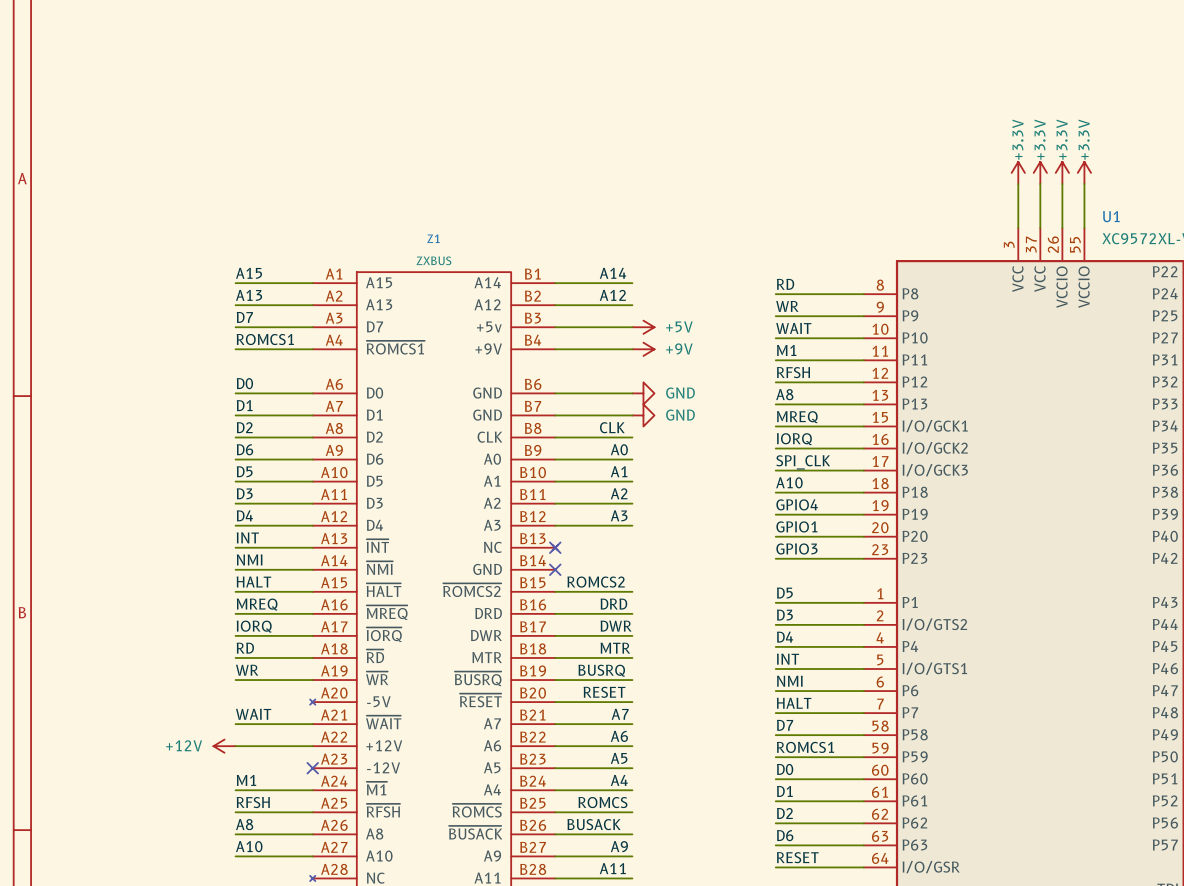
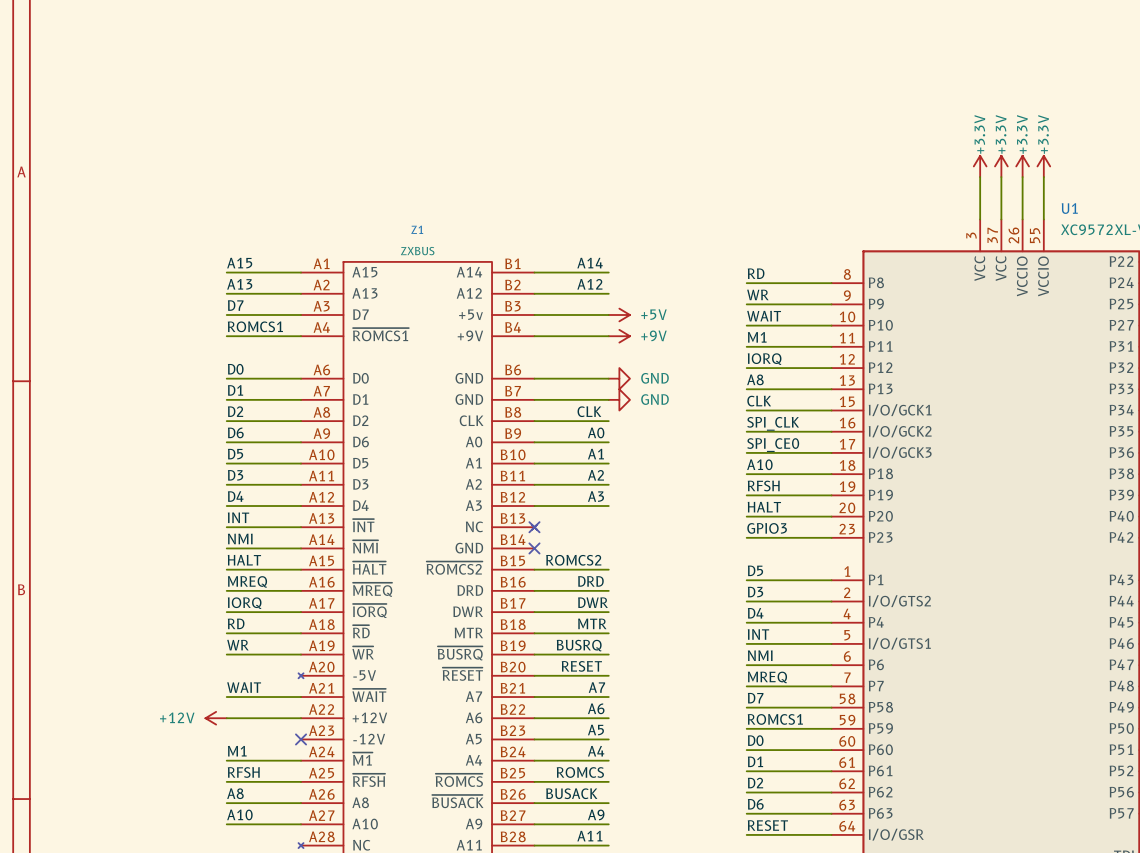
label: RFSH (793, 372) -> IORQ (764, 359)
label: MREQ (797, 417) -> CLK (759, 401)
label: IORQ (794, 439) -> SPI_CLK (773, 423)
label: SPI_CLK (803, 462) -> SPI_CE0 (773, 445)
label: GPIO4 (797, 504) -> RFSH (763, 485)
label: GPIO1 (796, 526) -> HALT (764, 507)
label: HALT (794, 703) -> MREQ (767, 677)

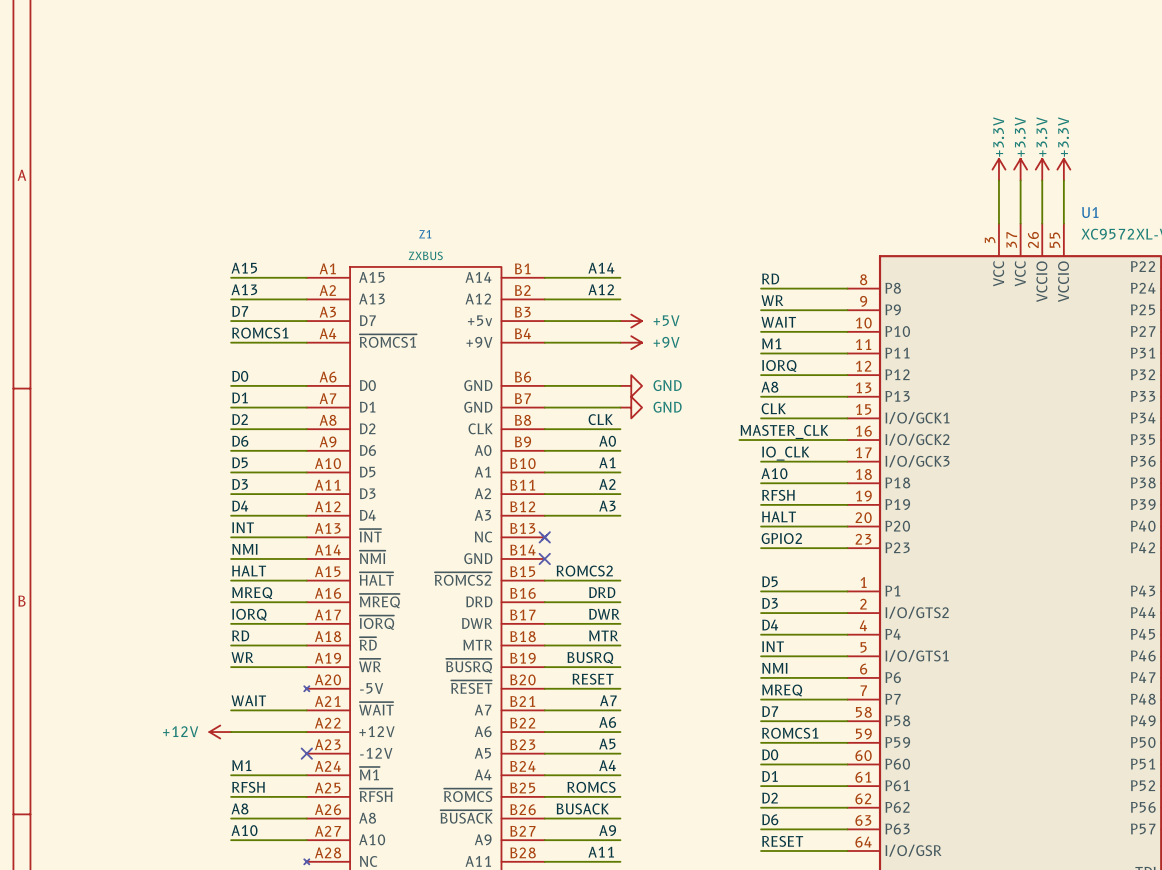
label: none -> MASTER_CLK (784, 431)
label: SPI_CLK (773, 423) -> none
wire: none -> (739, 440) (761, 440)
label: SPI_CE0 (773, 445) -> IO_CLK (785, 453)
label: GPIO3 (767, 528) -> GPIO2 (781, 538)

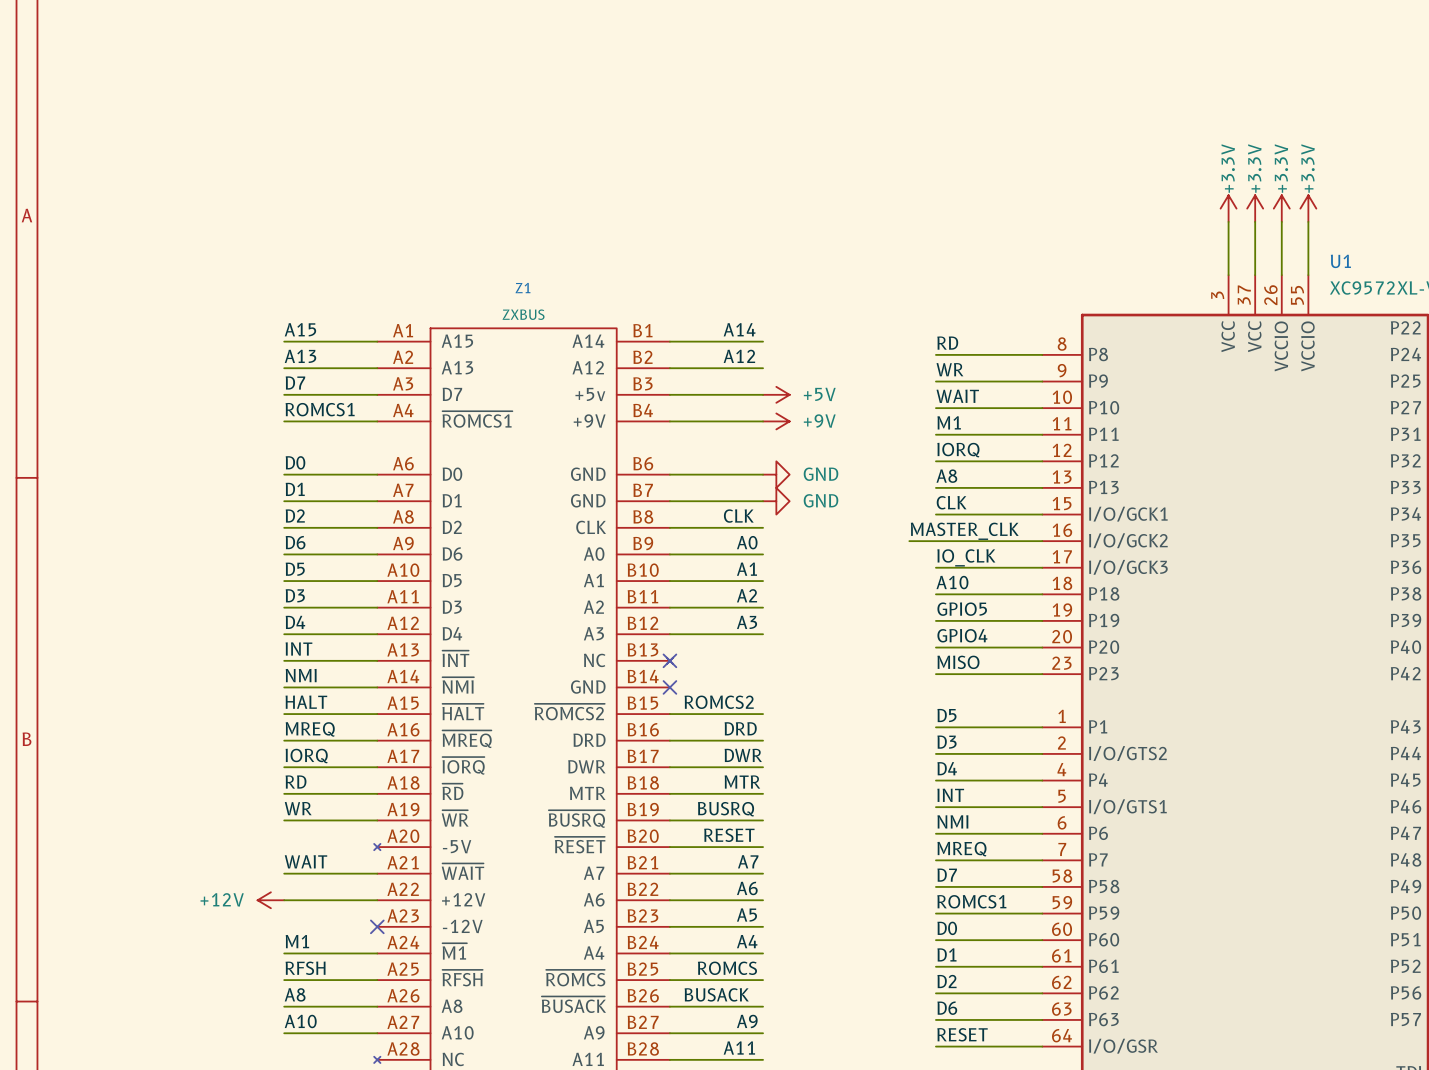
label: RFSH (778, 495) -> none
label: none -> GPIO5 (962, 609)
label: HALT (779, 516) -> none
label: none -> GPIO4 (962, 635)
label: GPIO2 (781, 538) -> MISO (958, 662)

